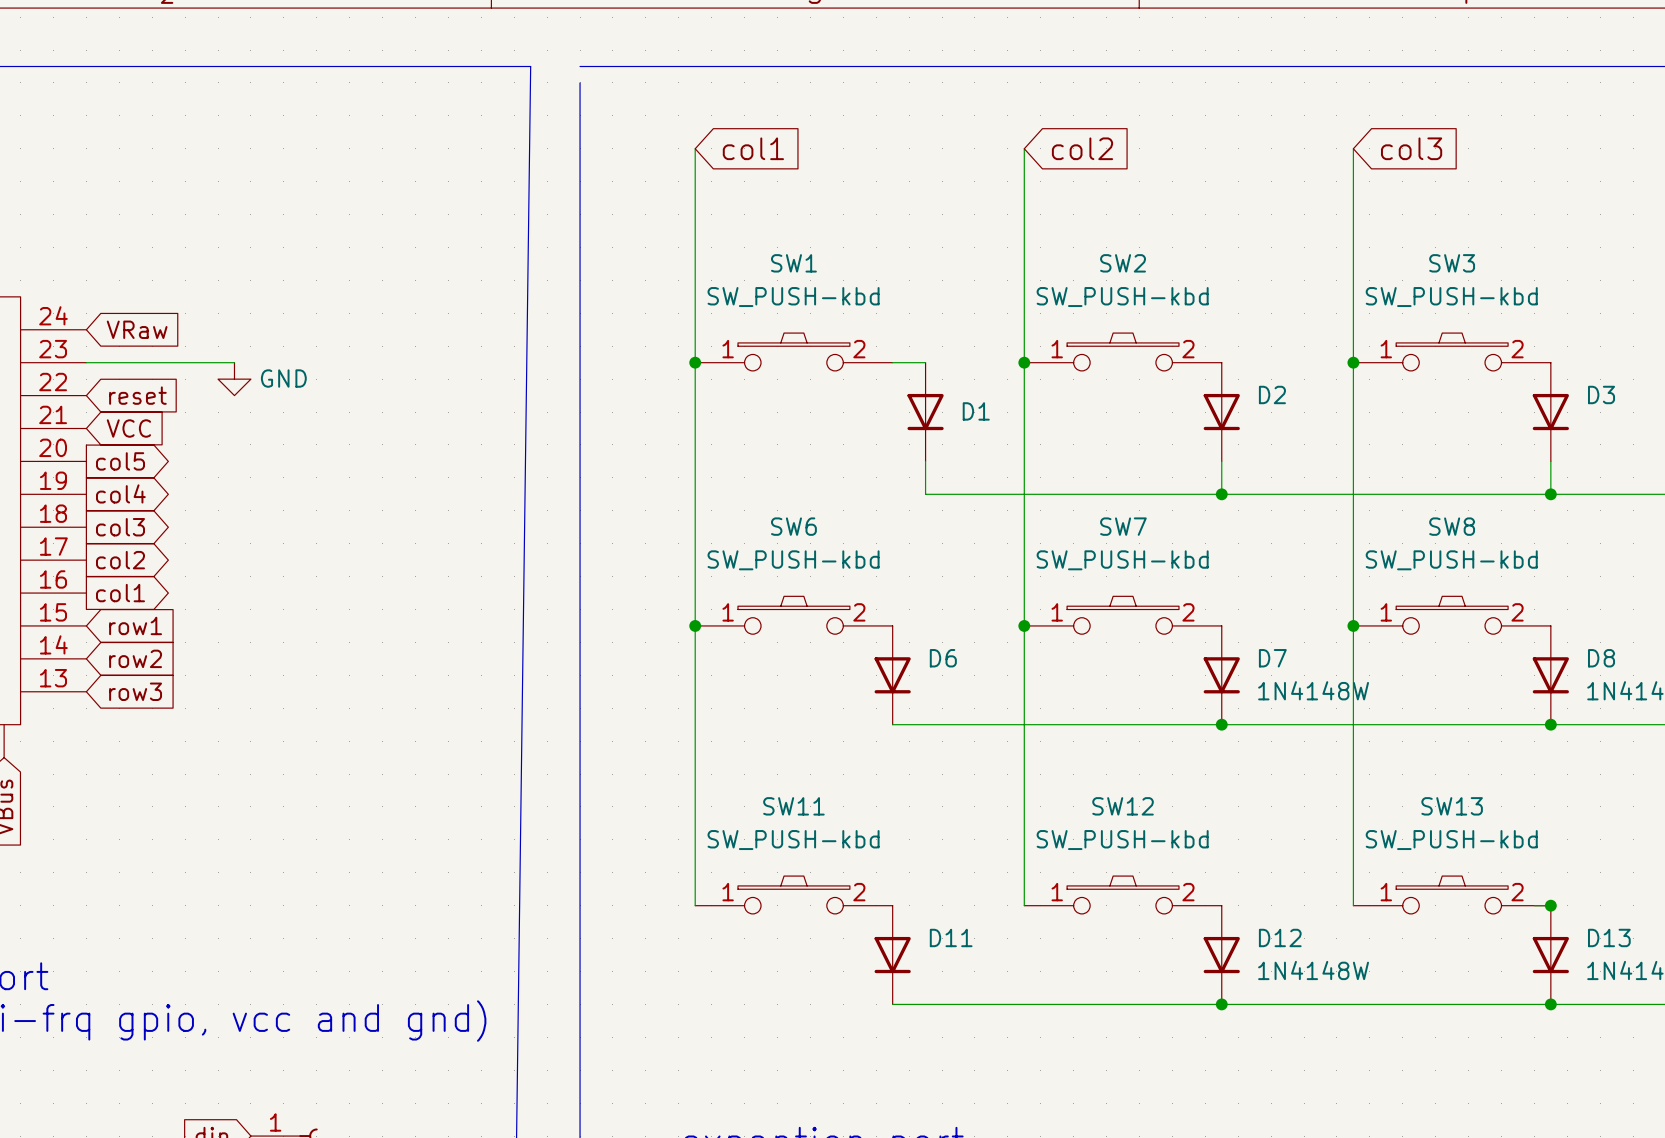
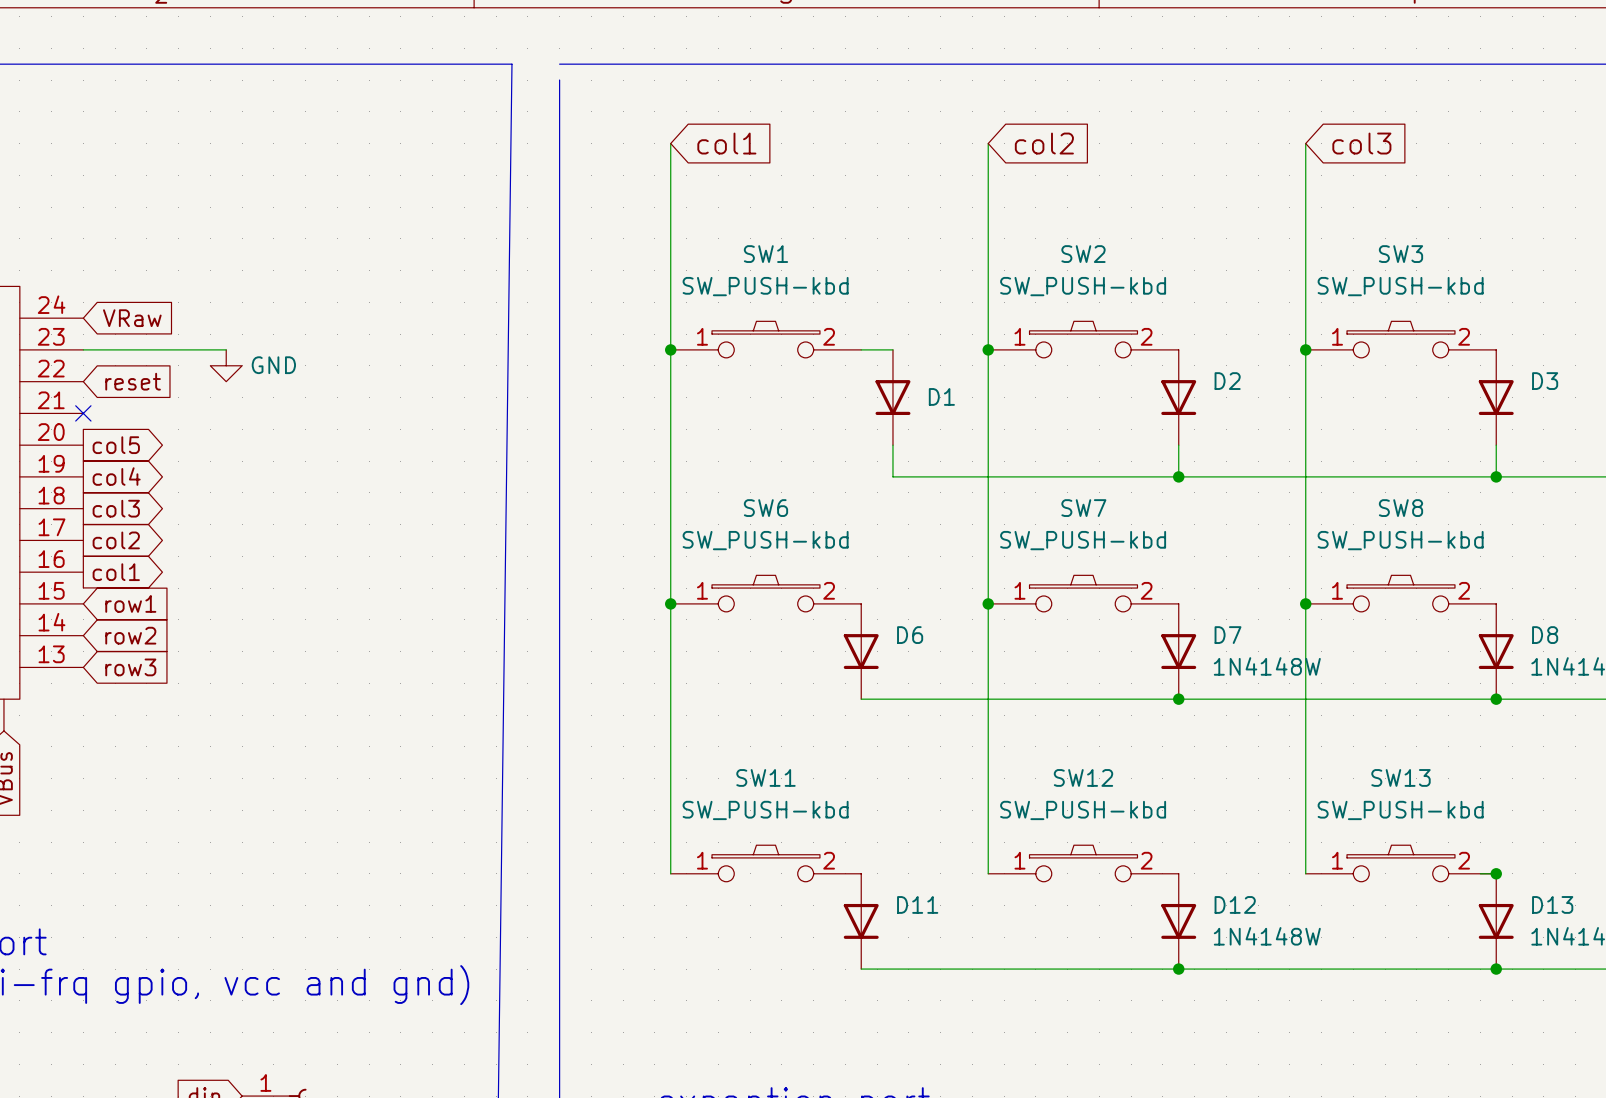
no-connect mark: none -> (83, 413)
global label: VCC (128, 428) -> none

